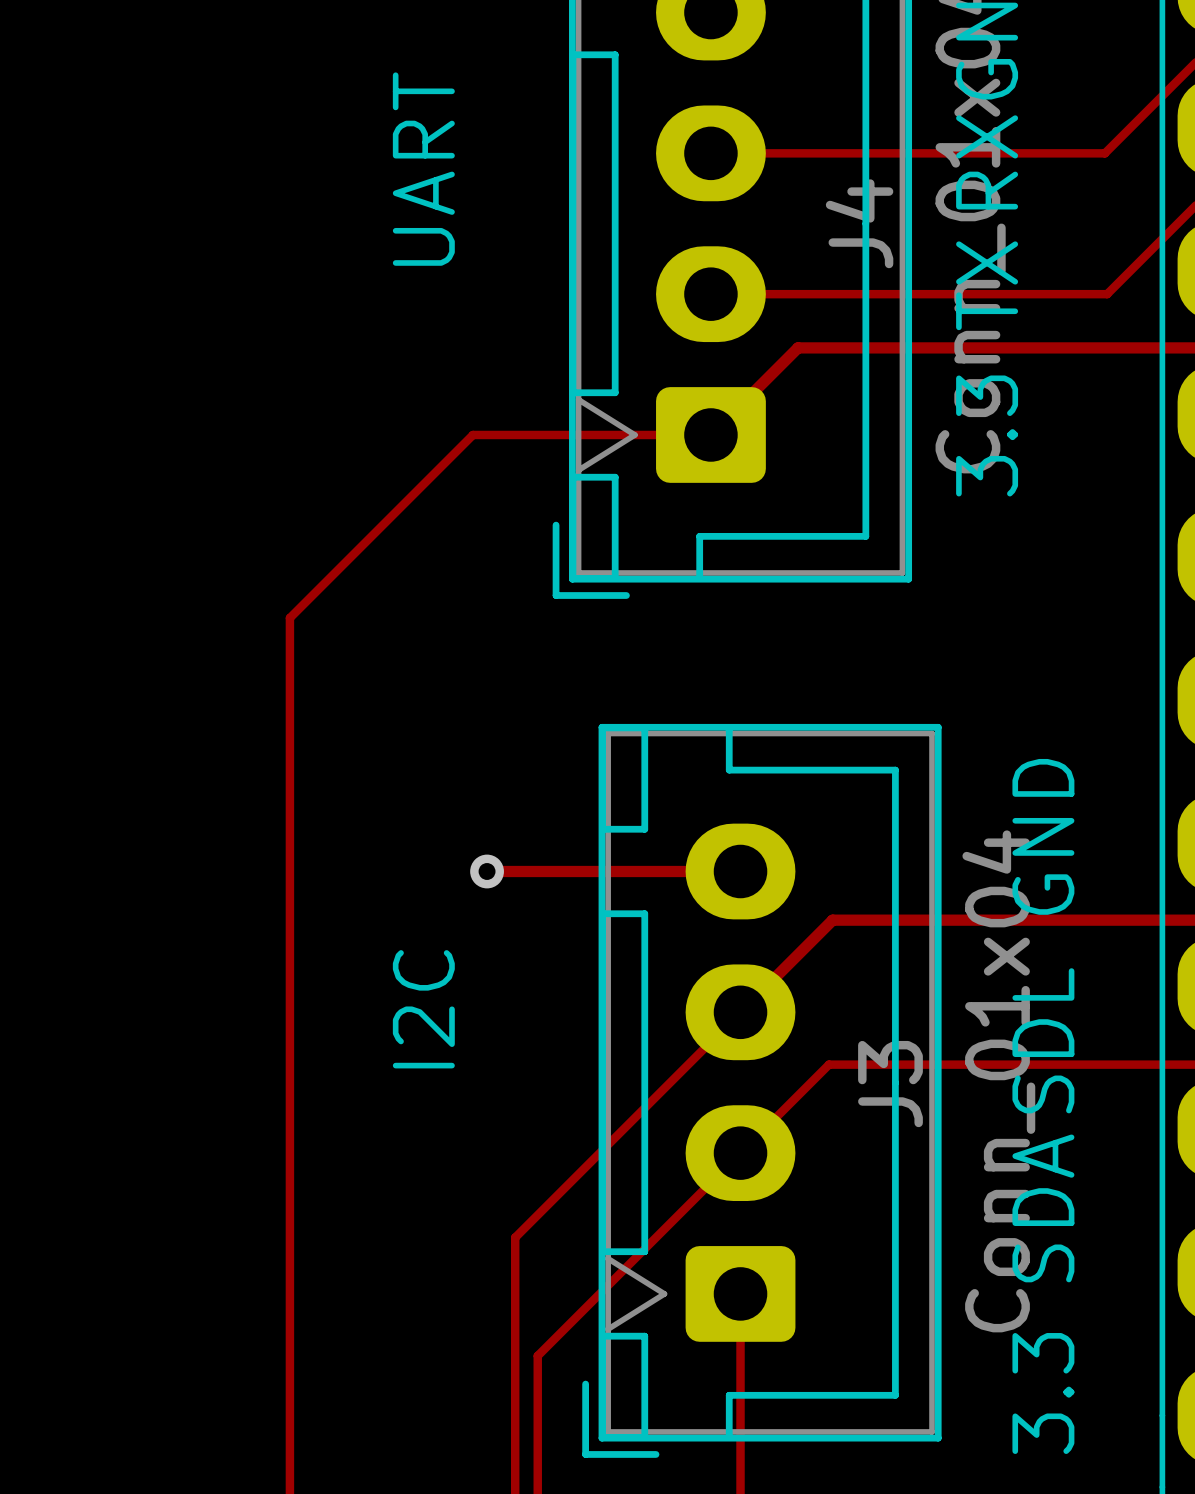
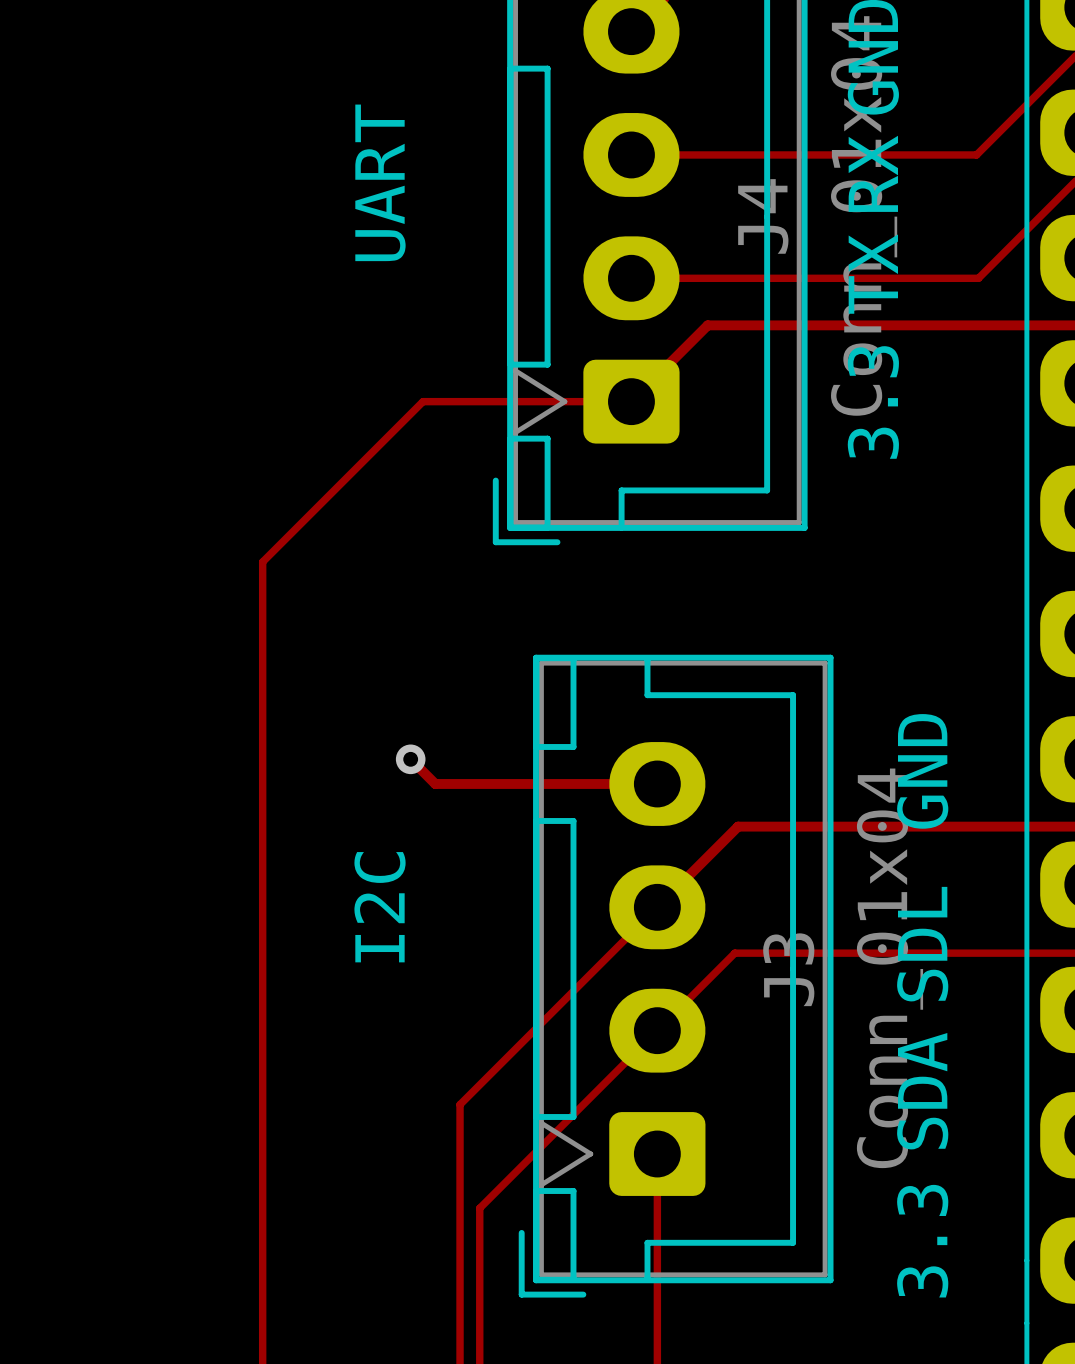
track: none -> (410, 759) (435, 783)
via position: (487, 871) -> (410, 759)

